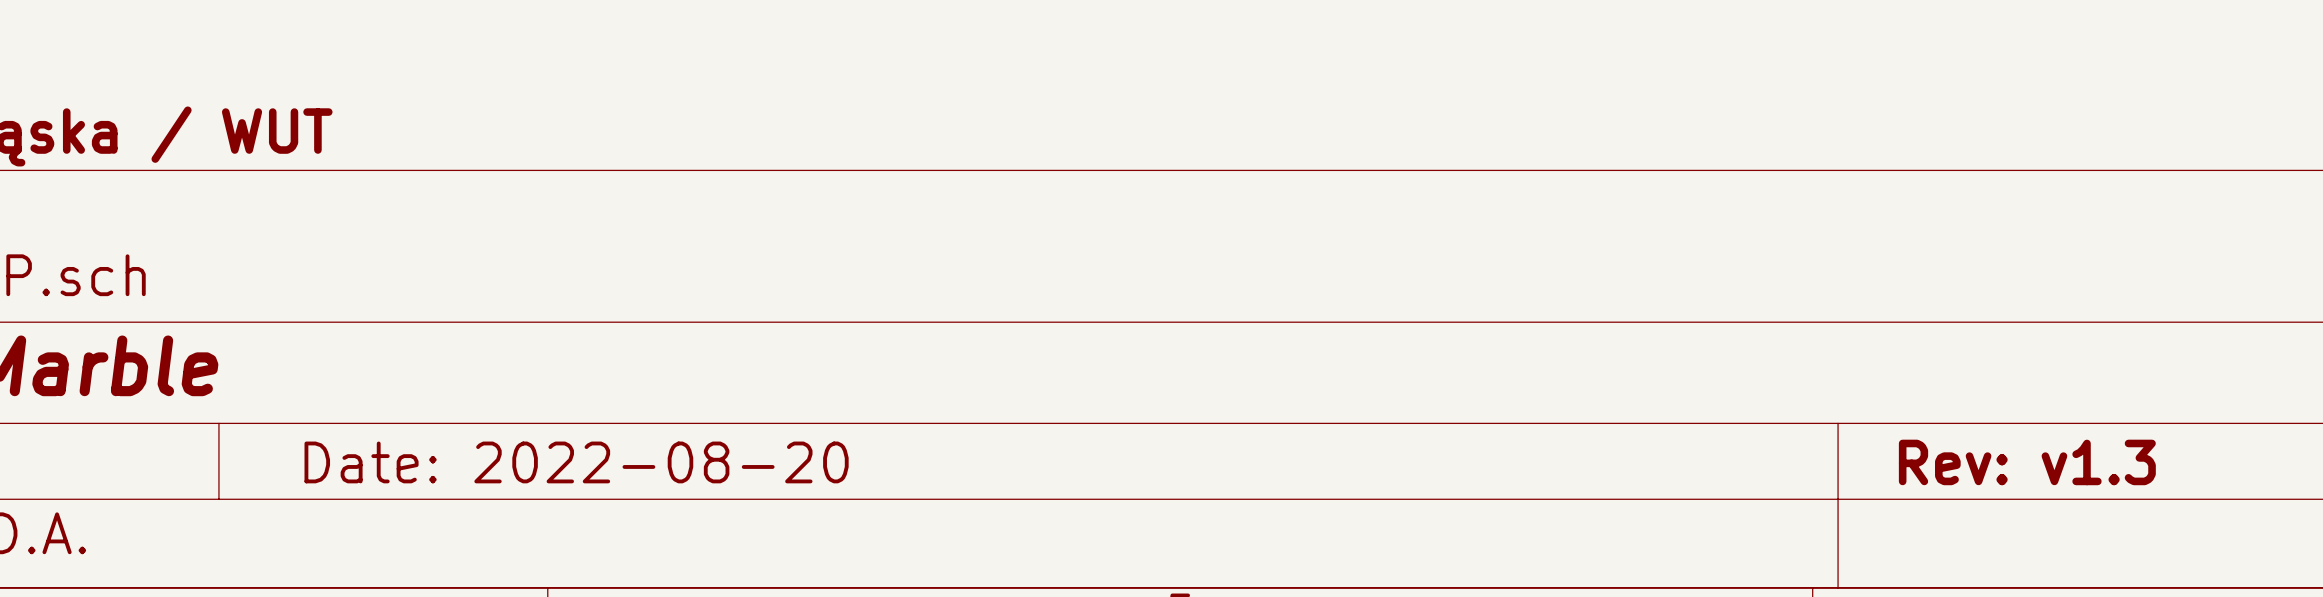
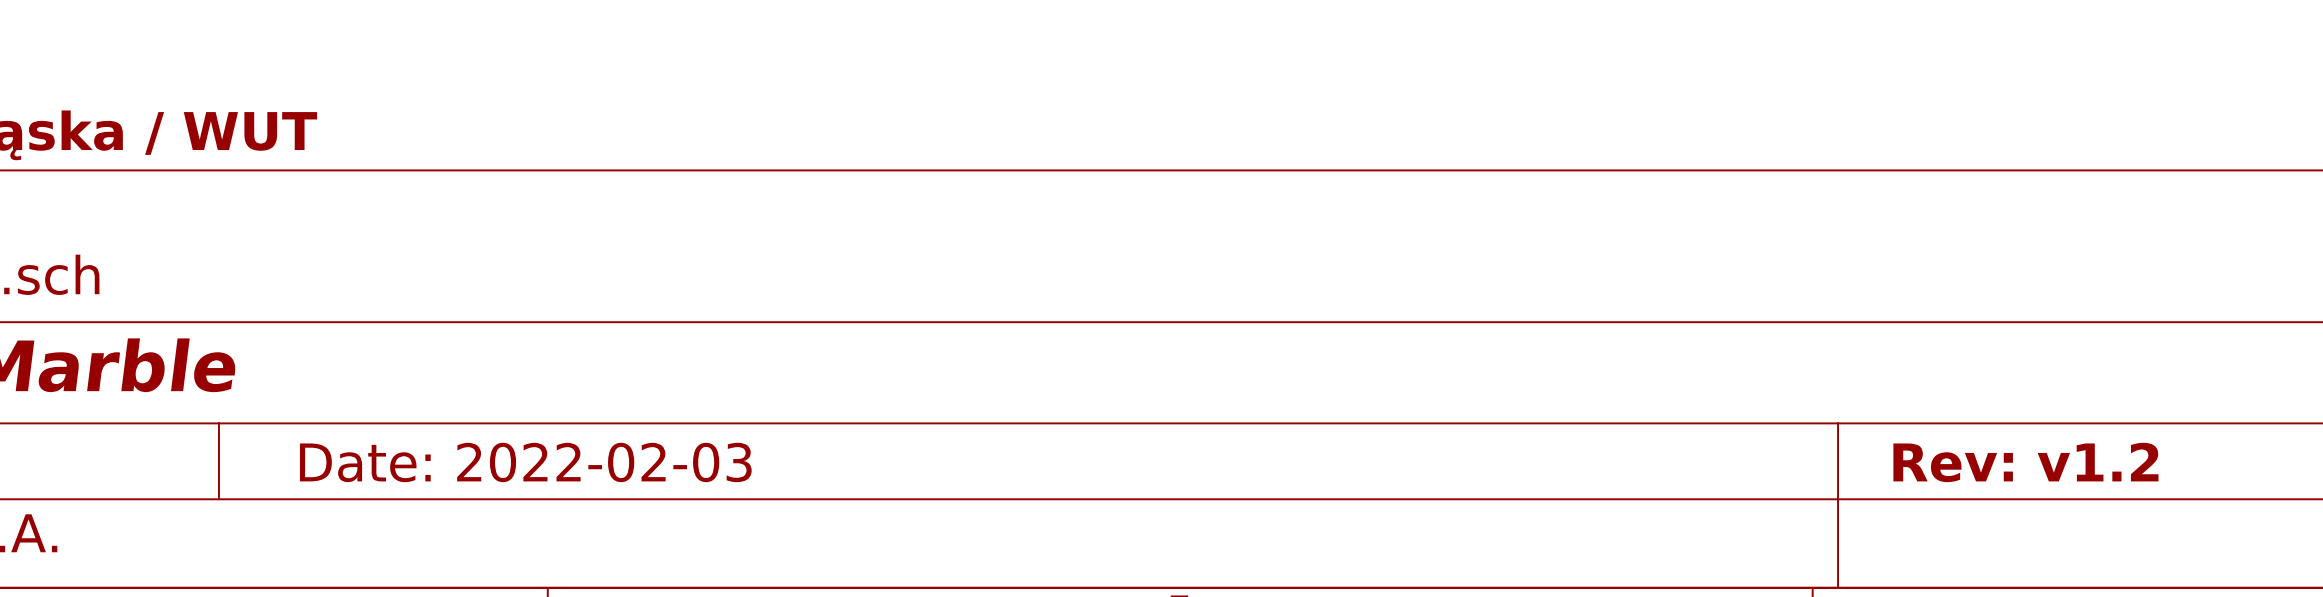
title block: Date: 2022-08-20 (576, 462) -> Date: 2022-02-03 (525, 462)
title block: Rev: v1.3 (2027, 462) -> Rev: v1.2 (2025, 462)

